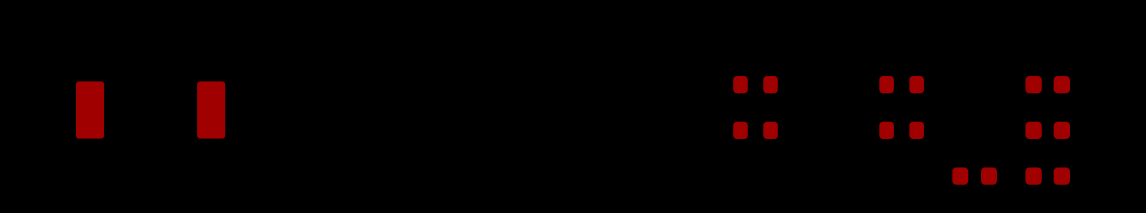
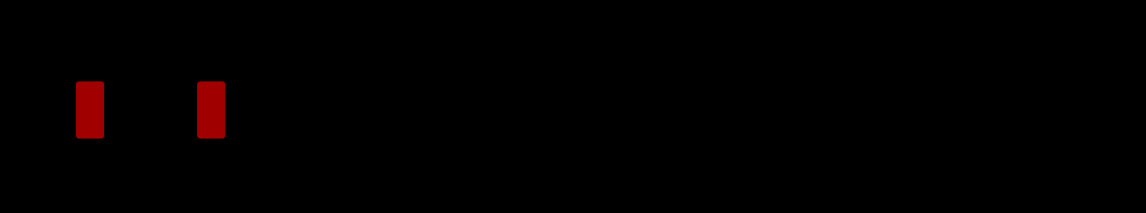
part: (755, 84) -> none
part: (901, 84) -> none
part: (1047, 84) -> none
part: (755, 130) -> none
part: (901, 130) -> none
part: (1047, 130) -> none
part: (974, 176) -> none
part: (1047, 176) -> none

